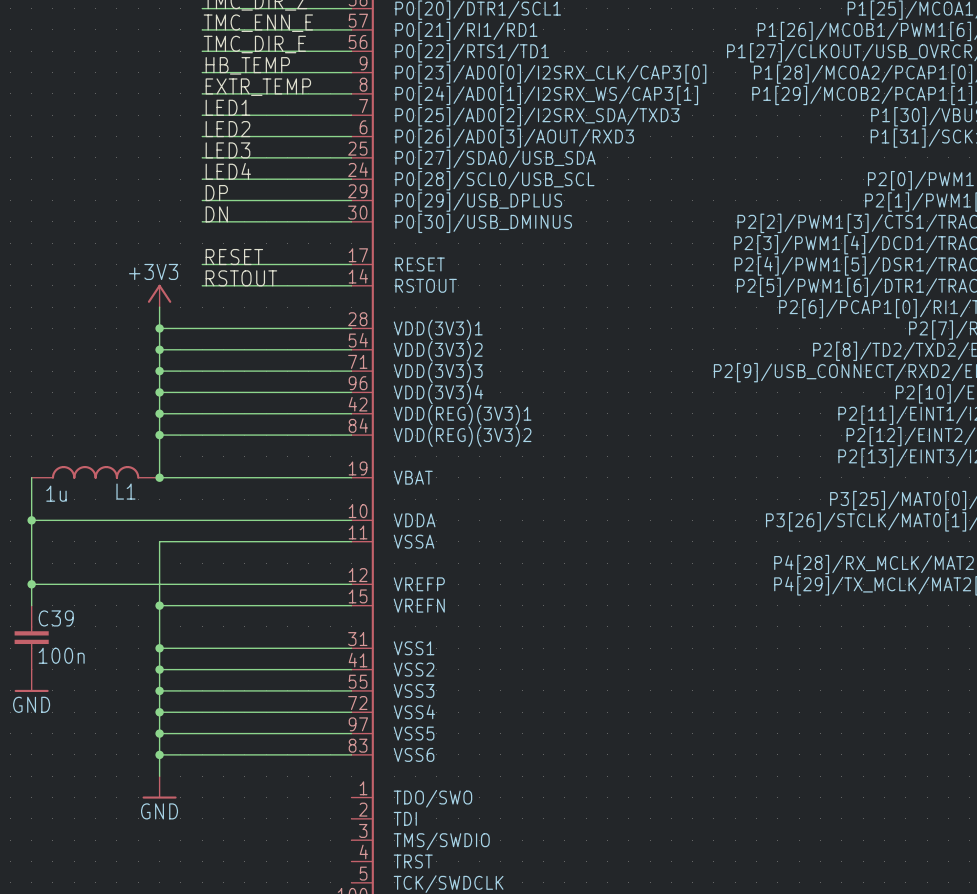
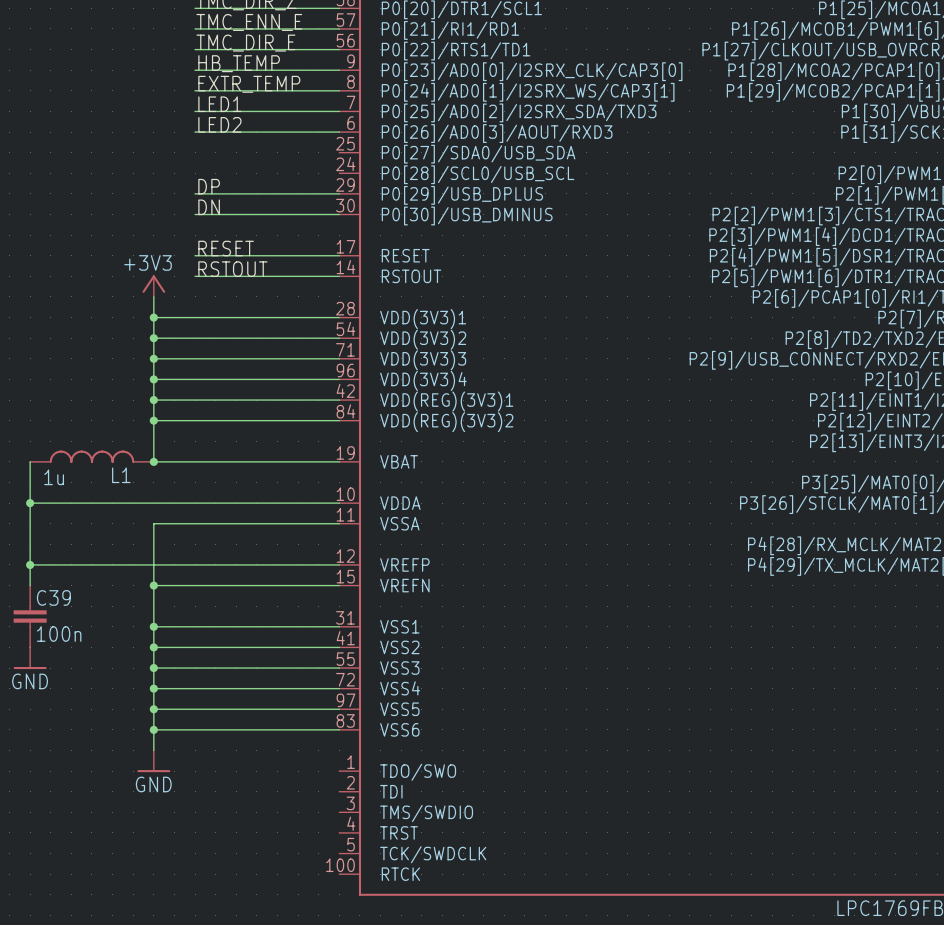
label: LED3 (227, 150) -> none
wire: (202, 157) (351, 157) -> none
label: LED4 (228, 171) -> none
wire: (202, 179) (351, 179) -> none

